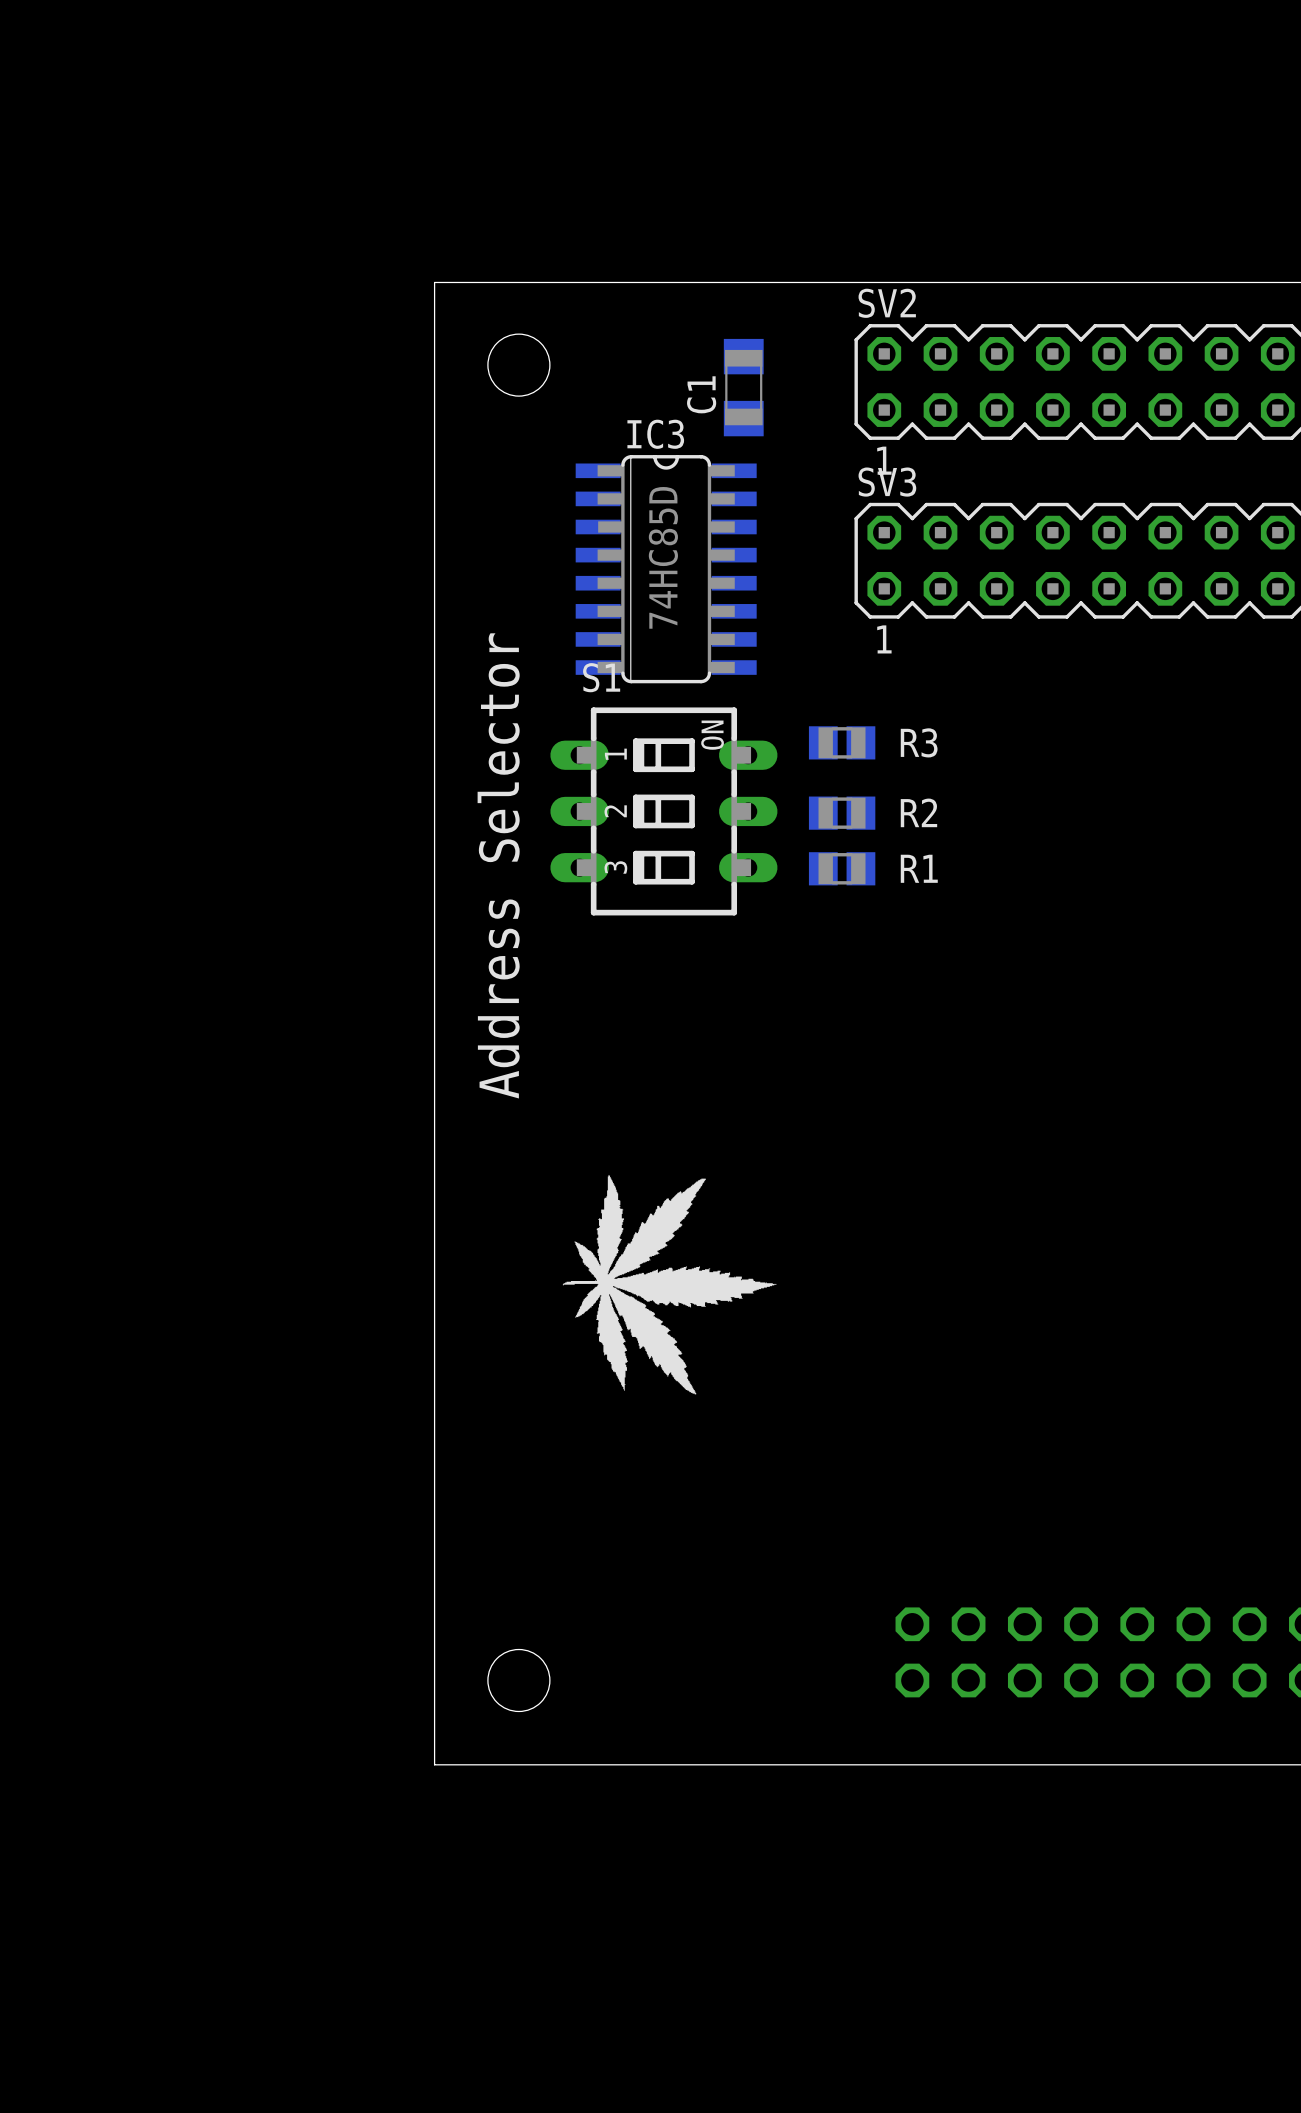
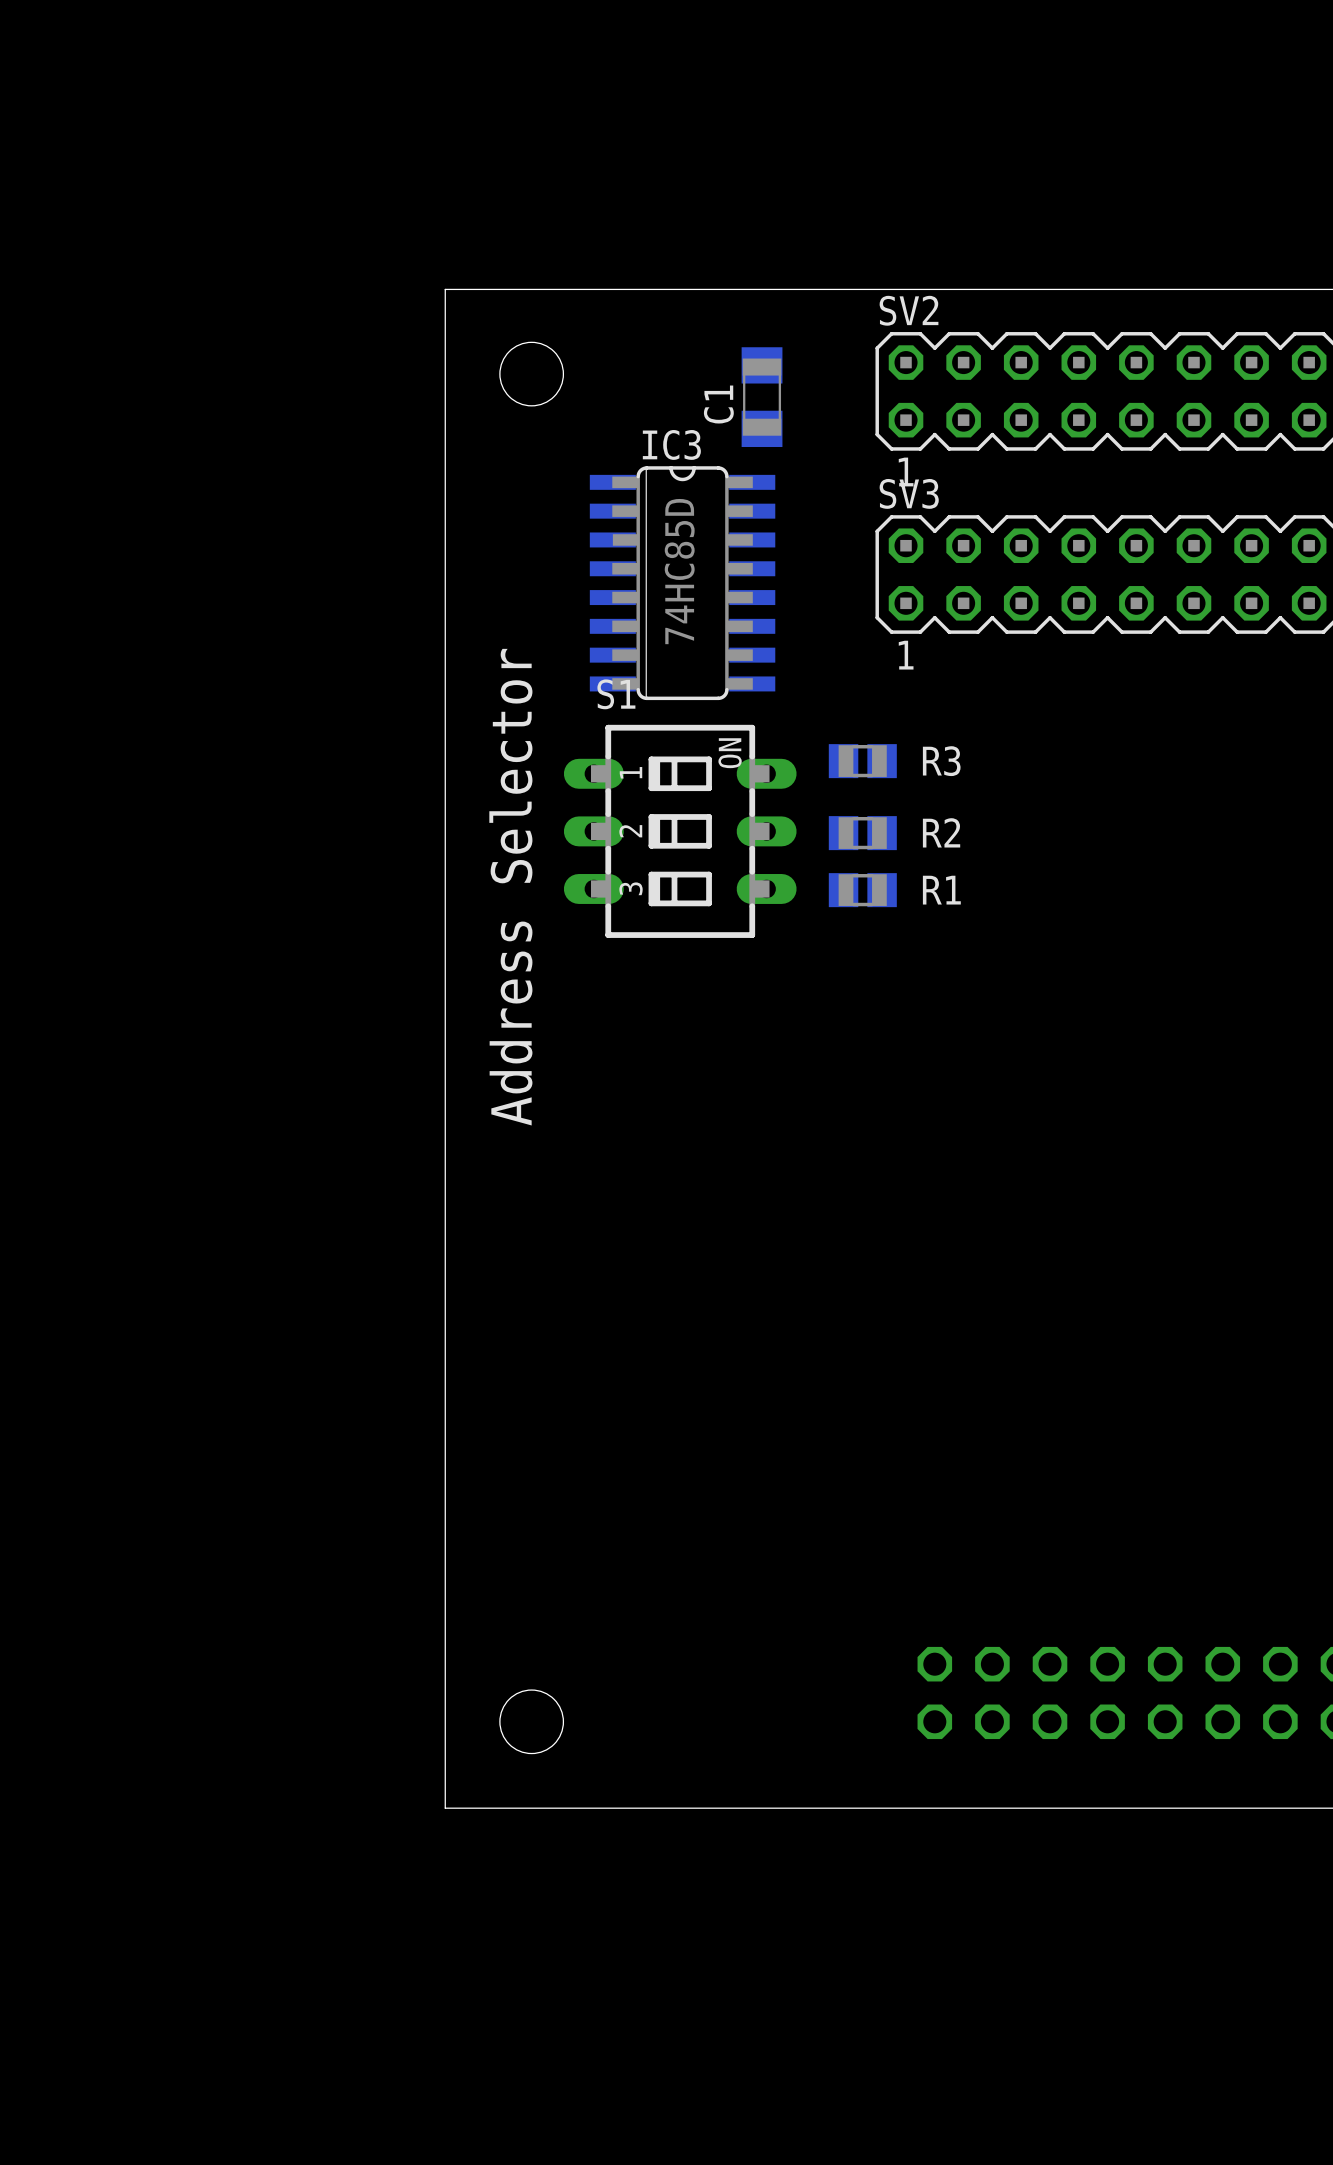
drawing: [562, 1174, 777, 1395] -> none

